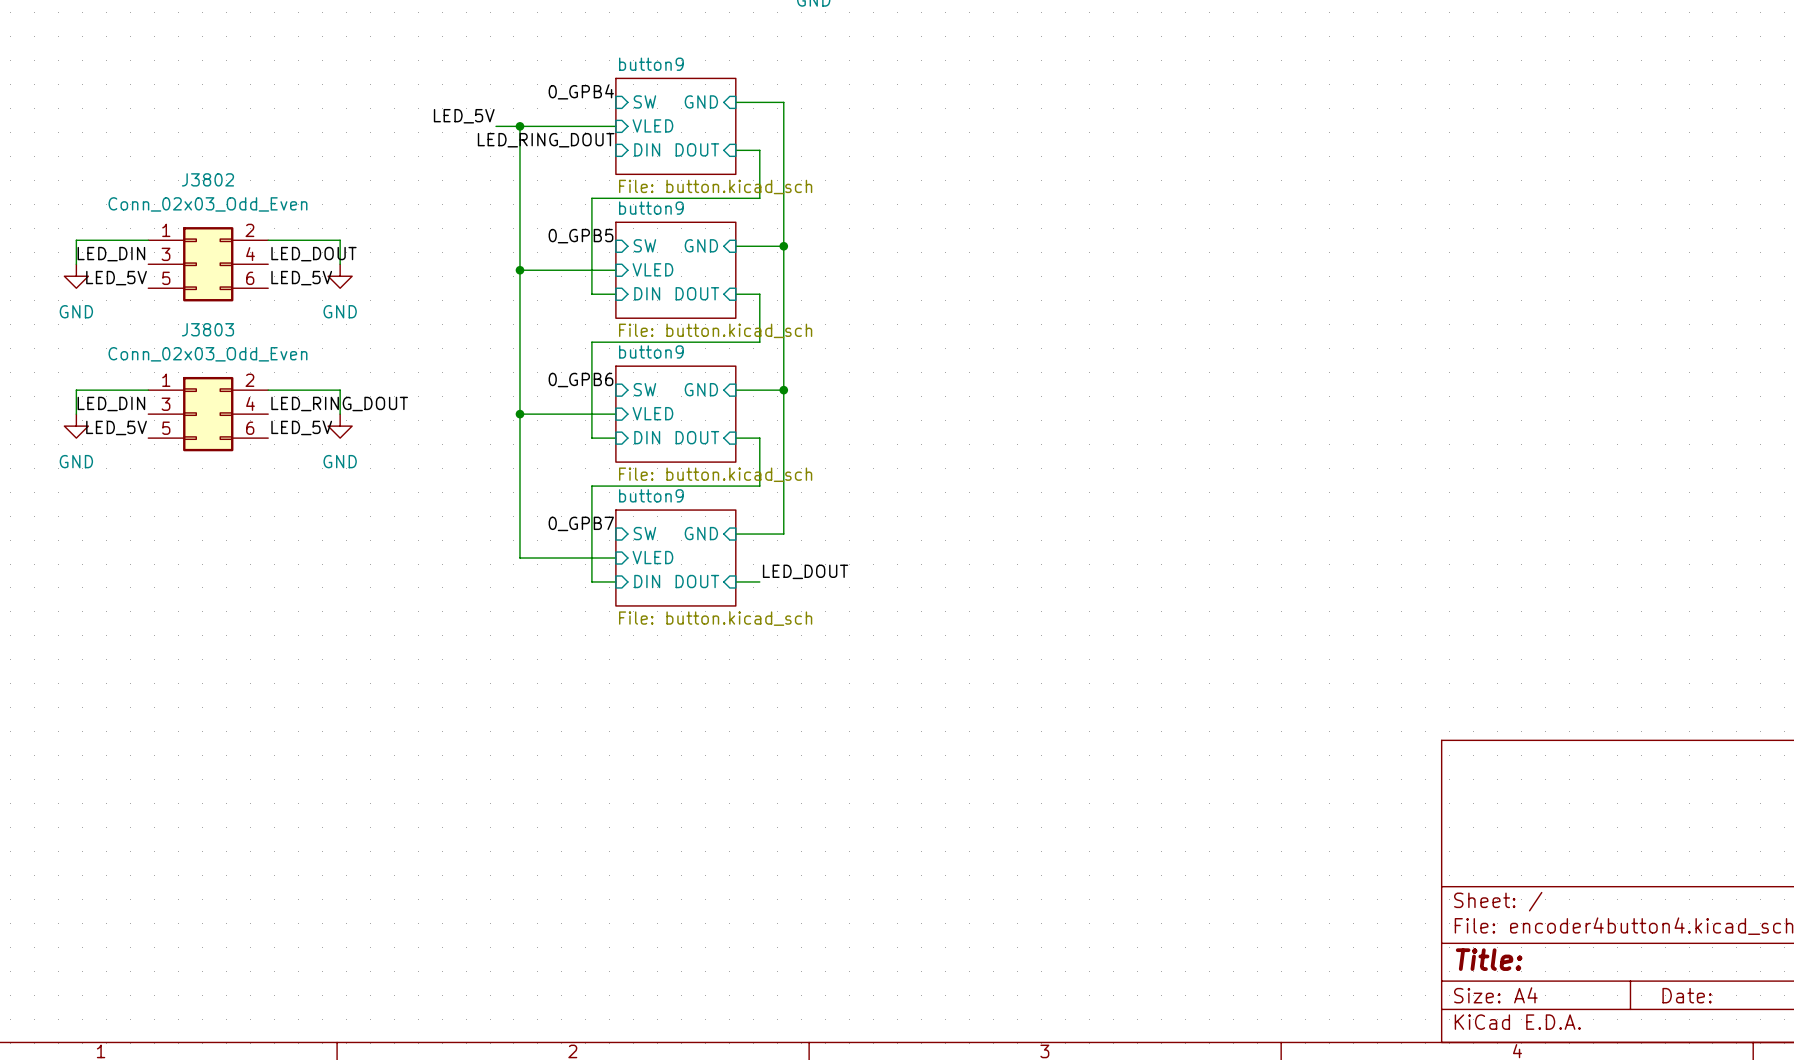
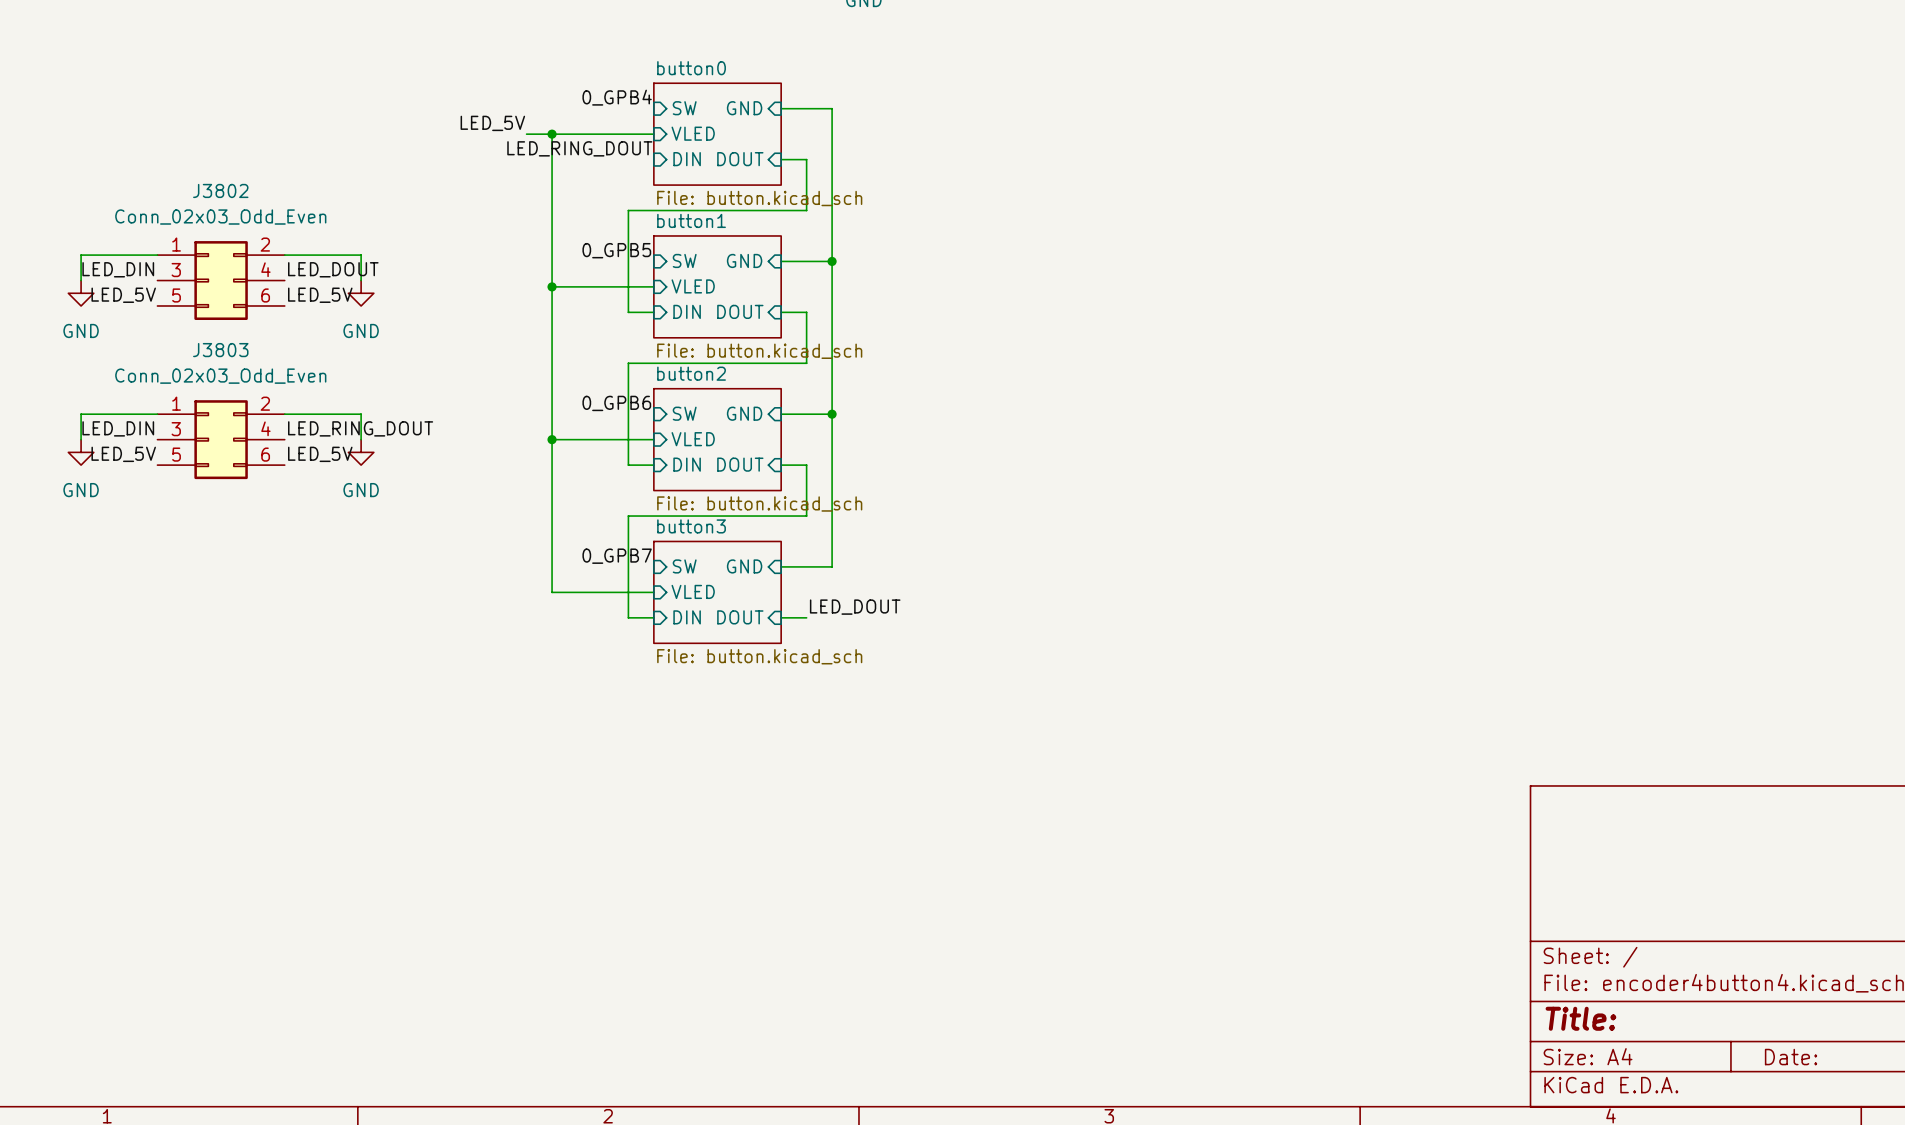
sheet button9 name: button9 (651, 64) -> button0 (691, 68)
sheet button9 name: button9 (651, 208) -> button1 (691, 220)
sheet button9 name: button9 (651, 351) -> button2 (691, 373)
sheet button9 name: button9 (651, 495) -> button3 (691, 526)

